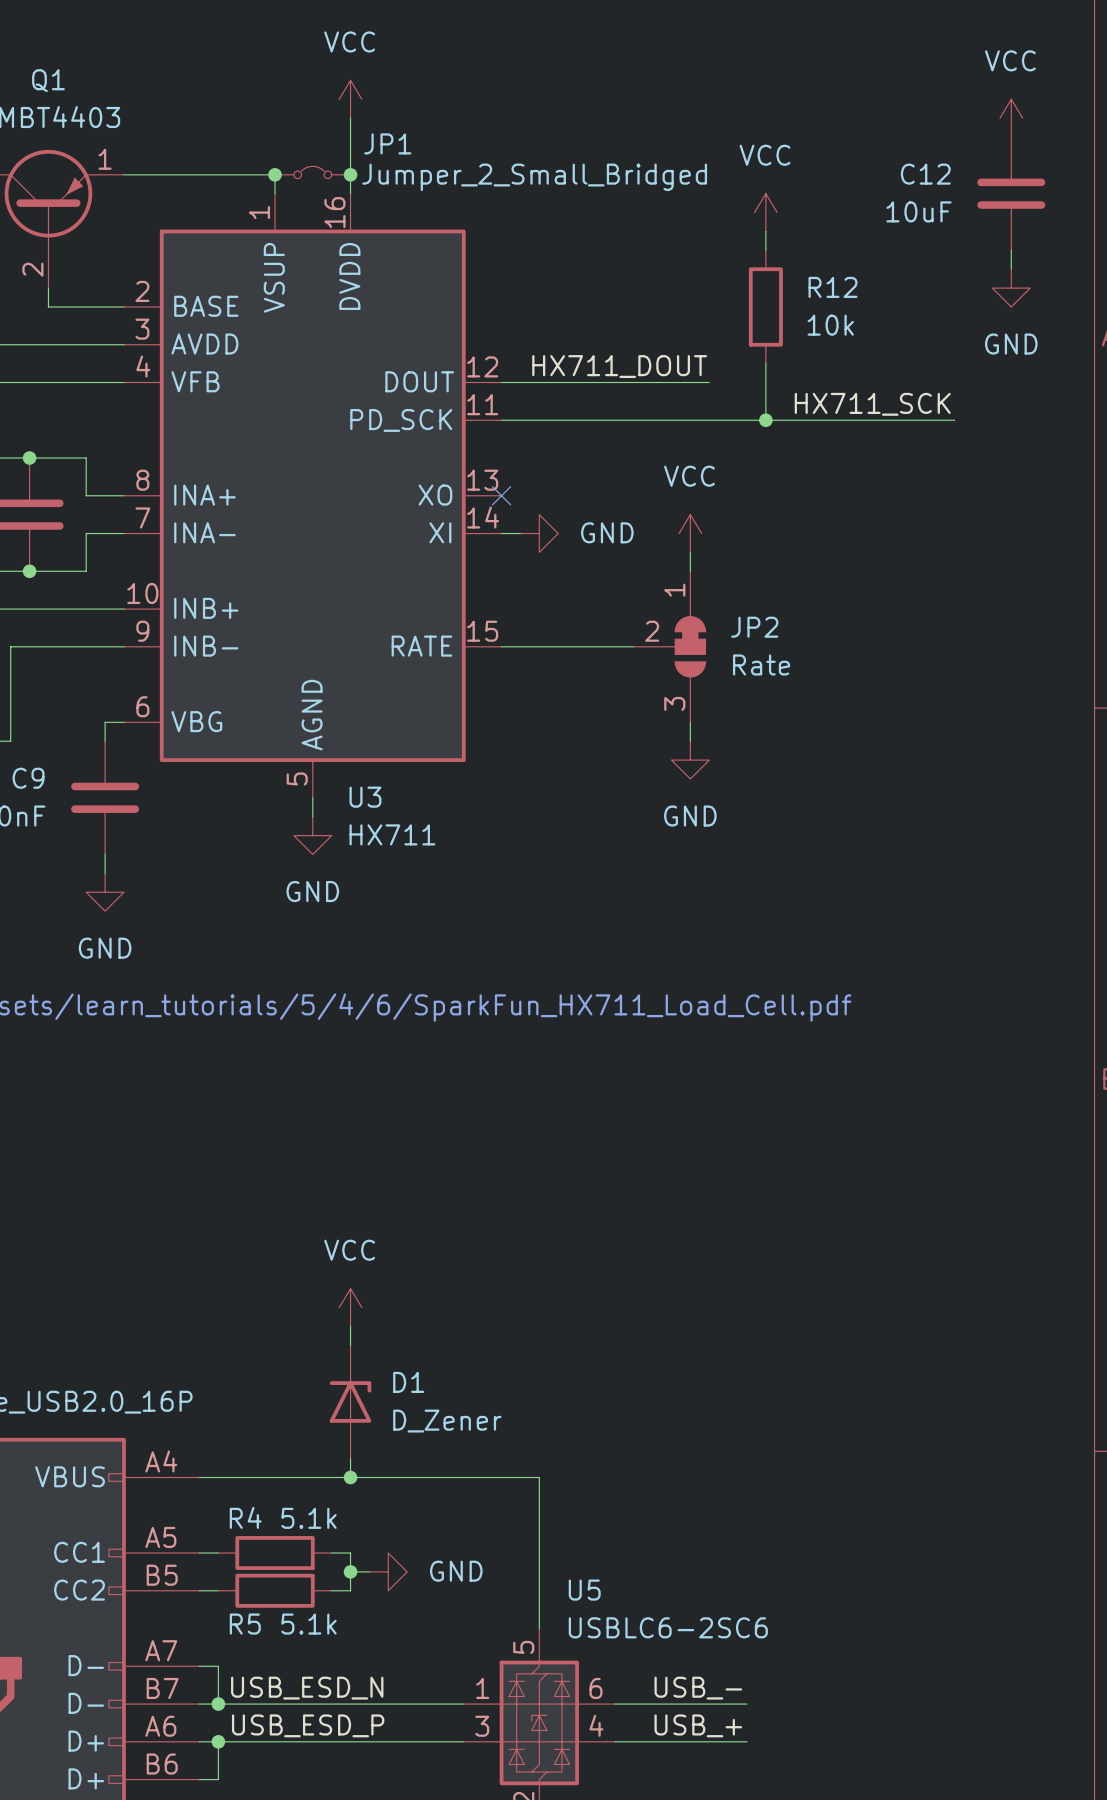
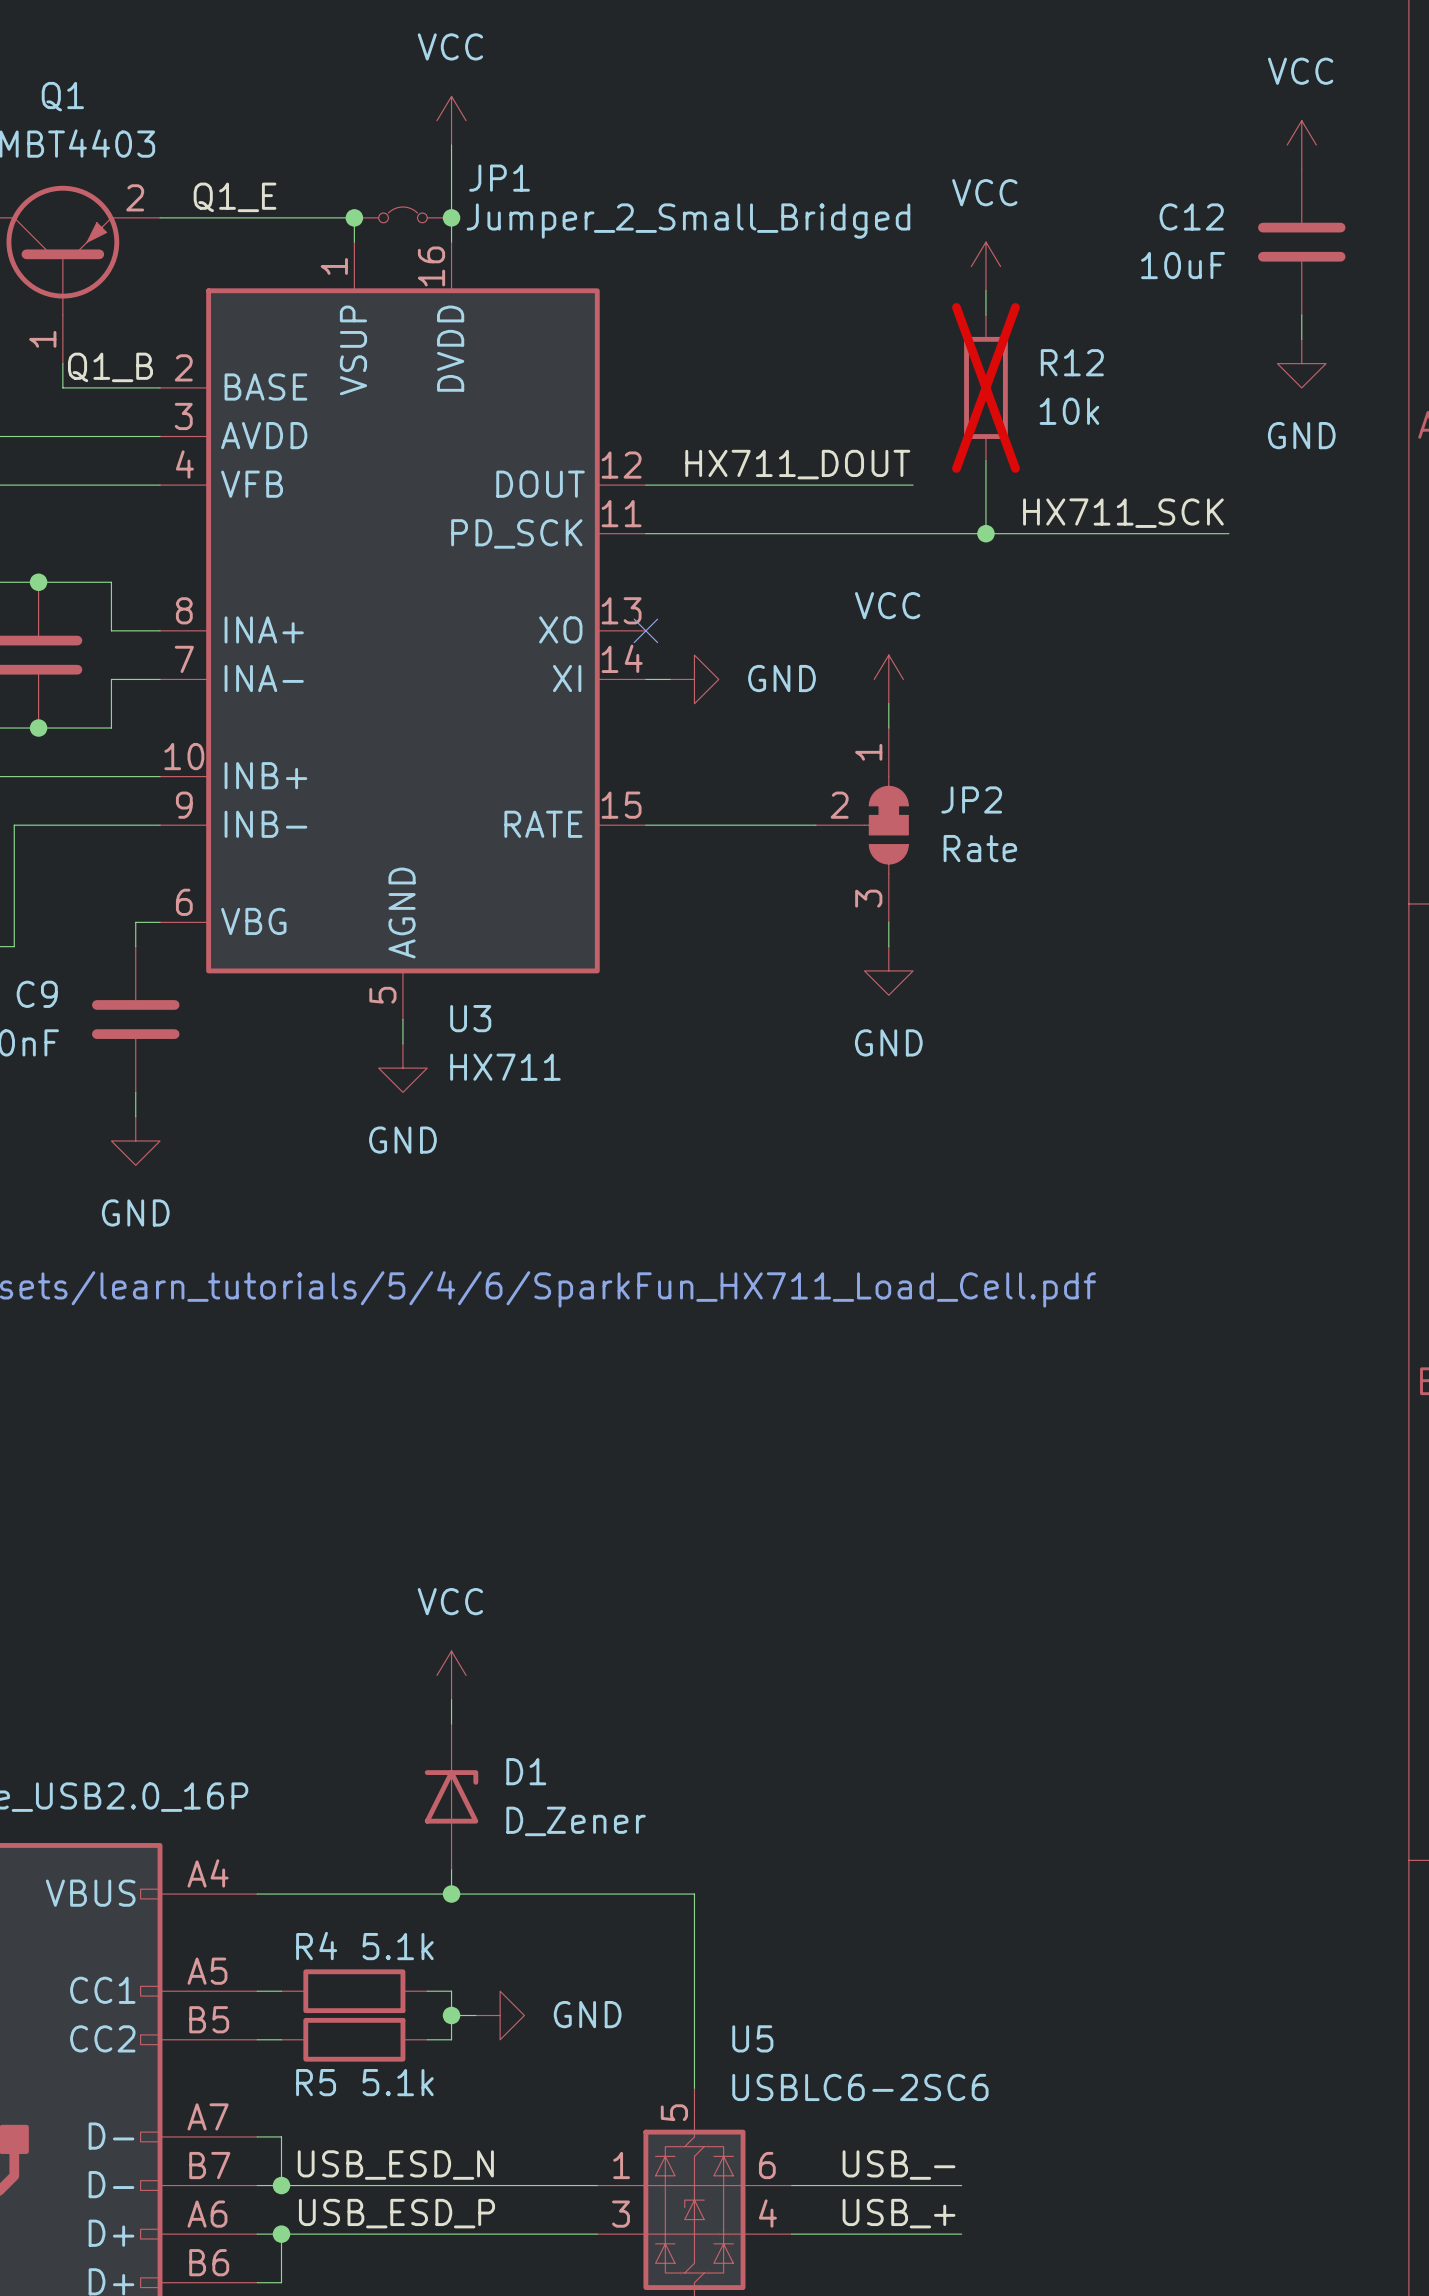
label: none -> Q1_E (235, 197)
Q1 pin number: 1 (105, 159) -> 2 (135, 197)
Q1 pin number: 2 (32, 269) -> 1 (42, 339)
label: none -> Q1_B (110, 367)
R12 do-not-place cross: none -> (985, 387)

